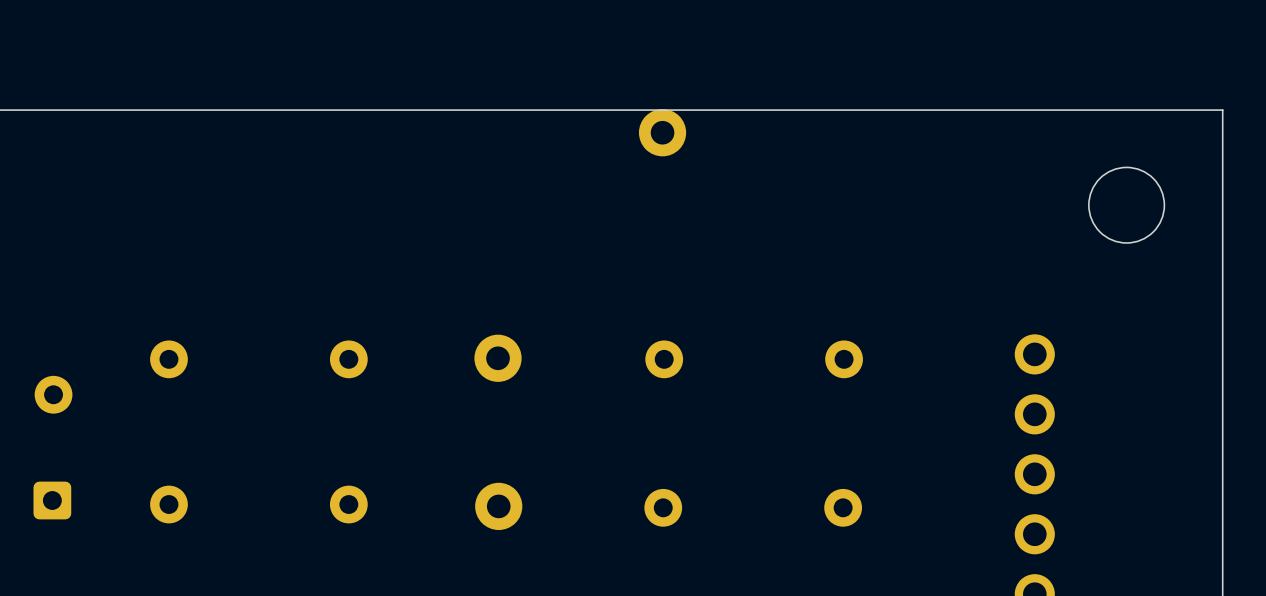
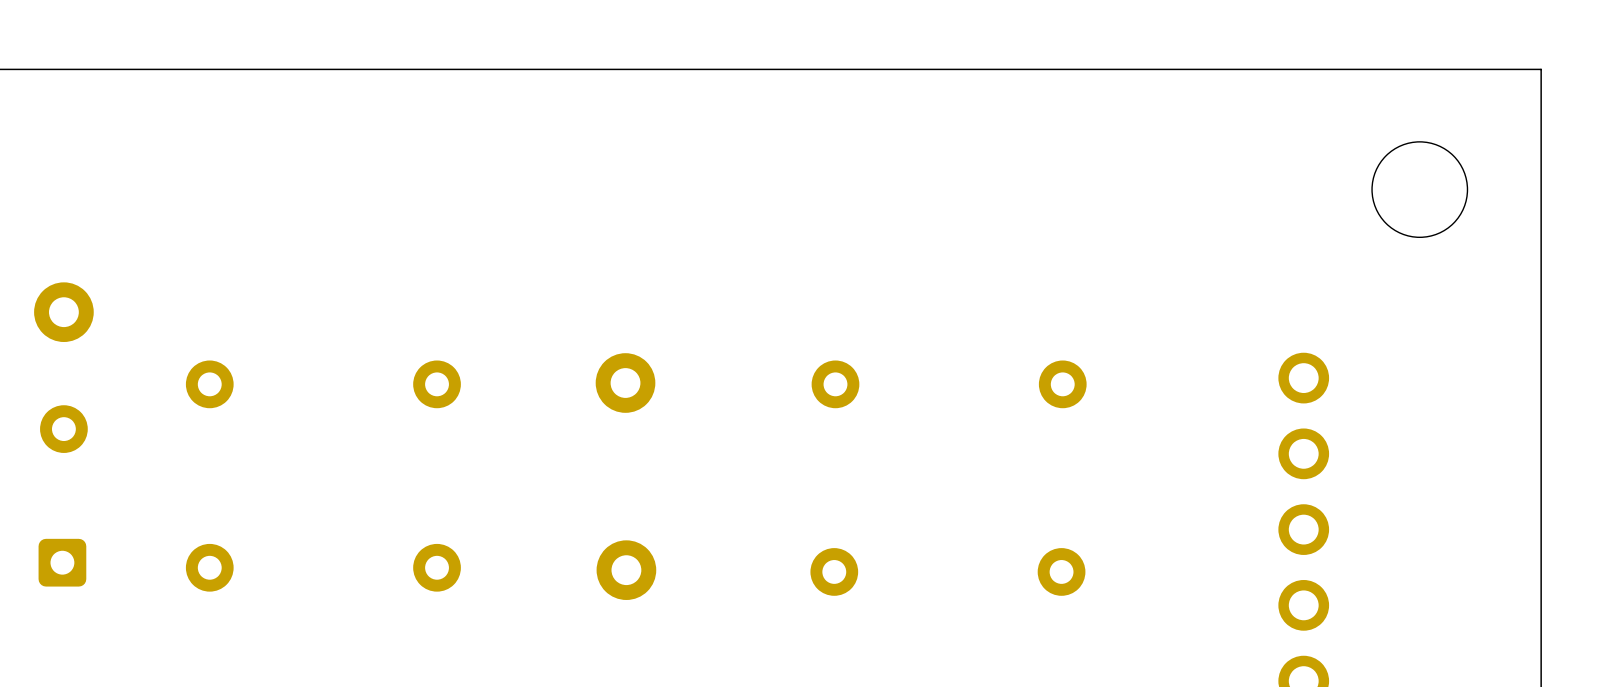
part: (662, 132) -> none
part: none -> (63, 312)

